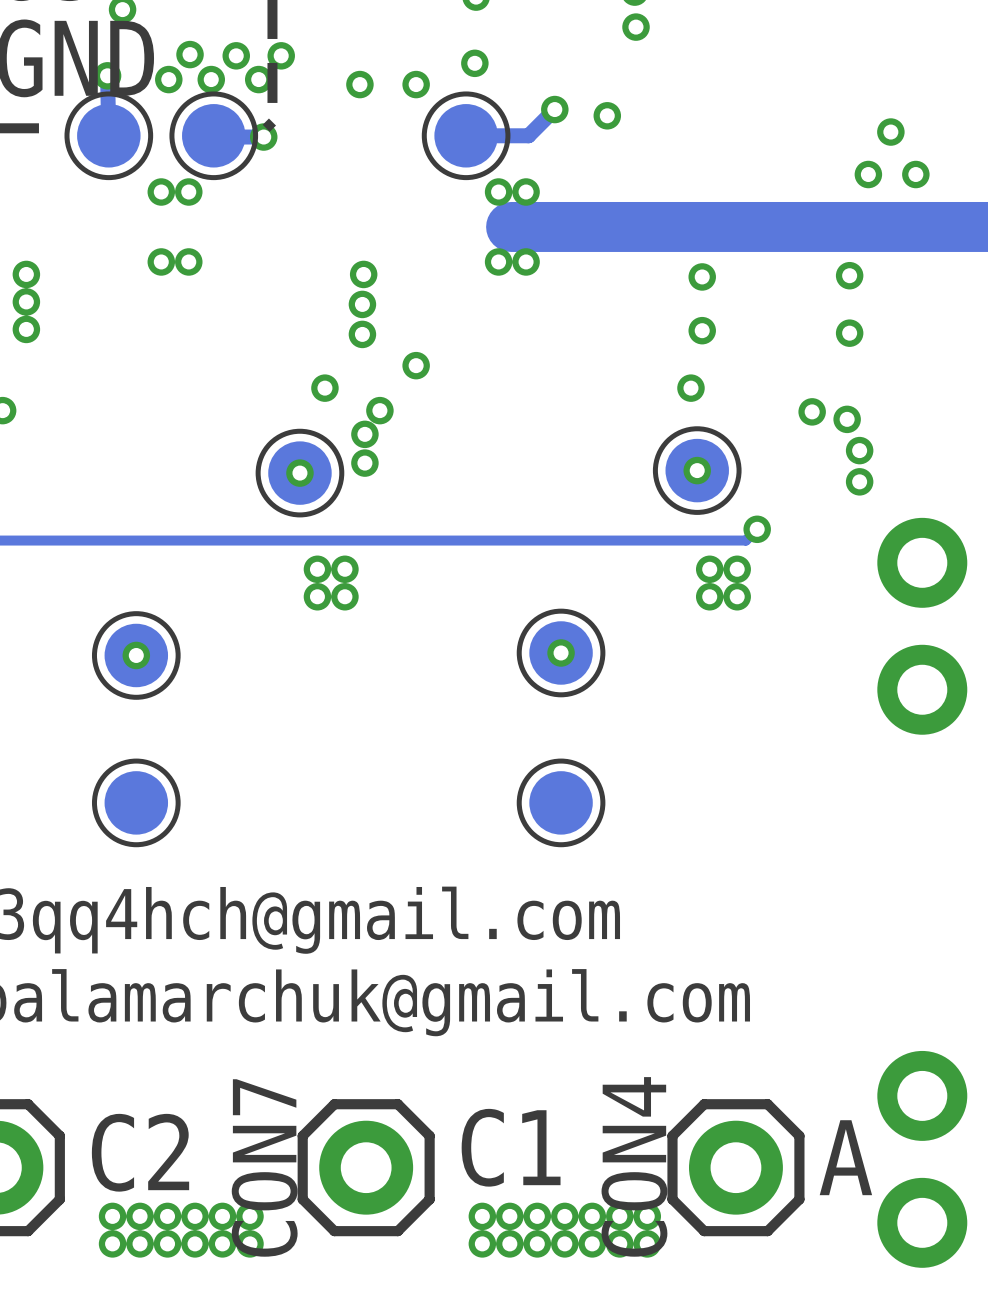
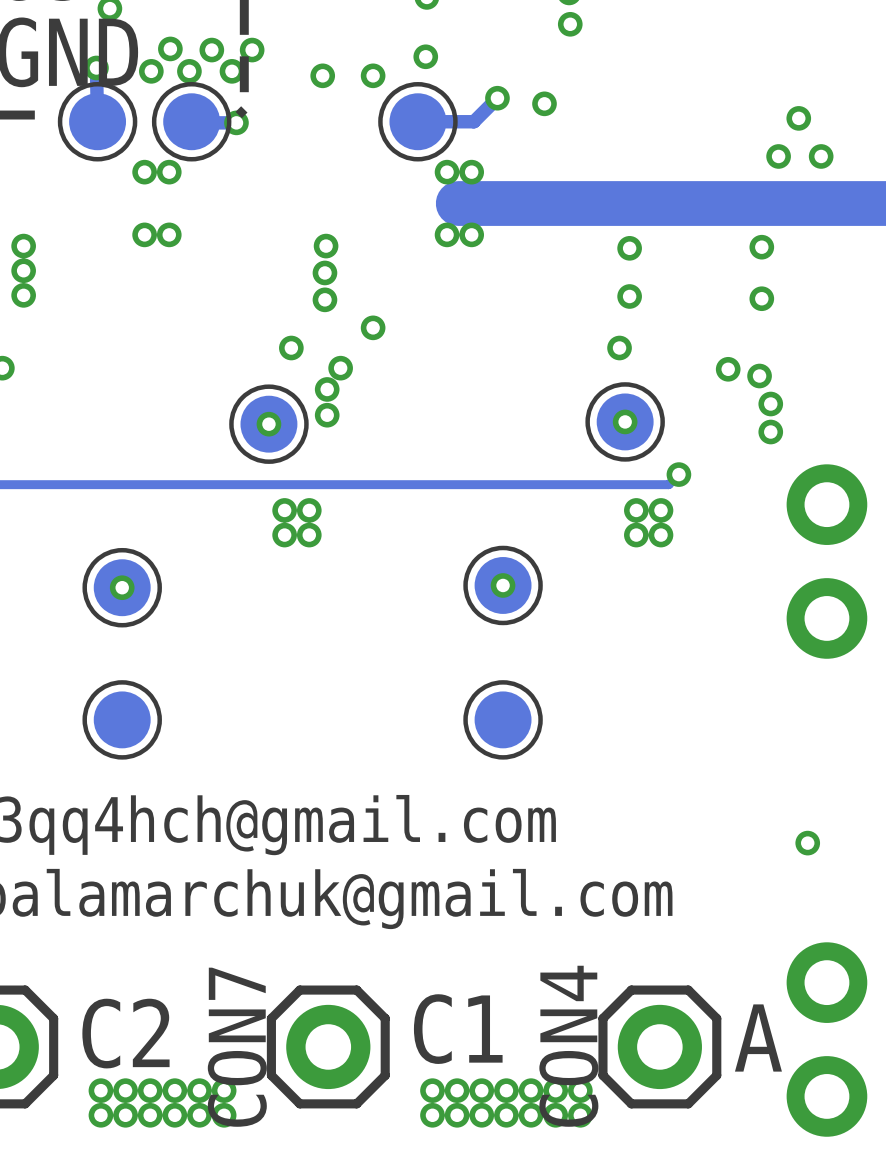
via: none -> (807, 843)

